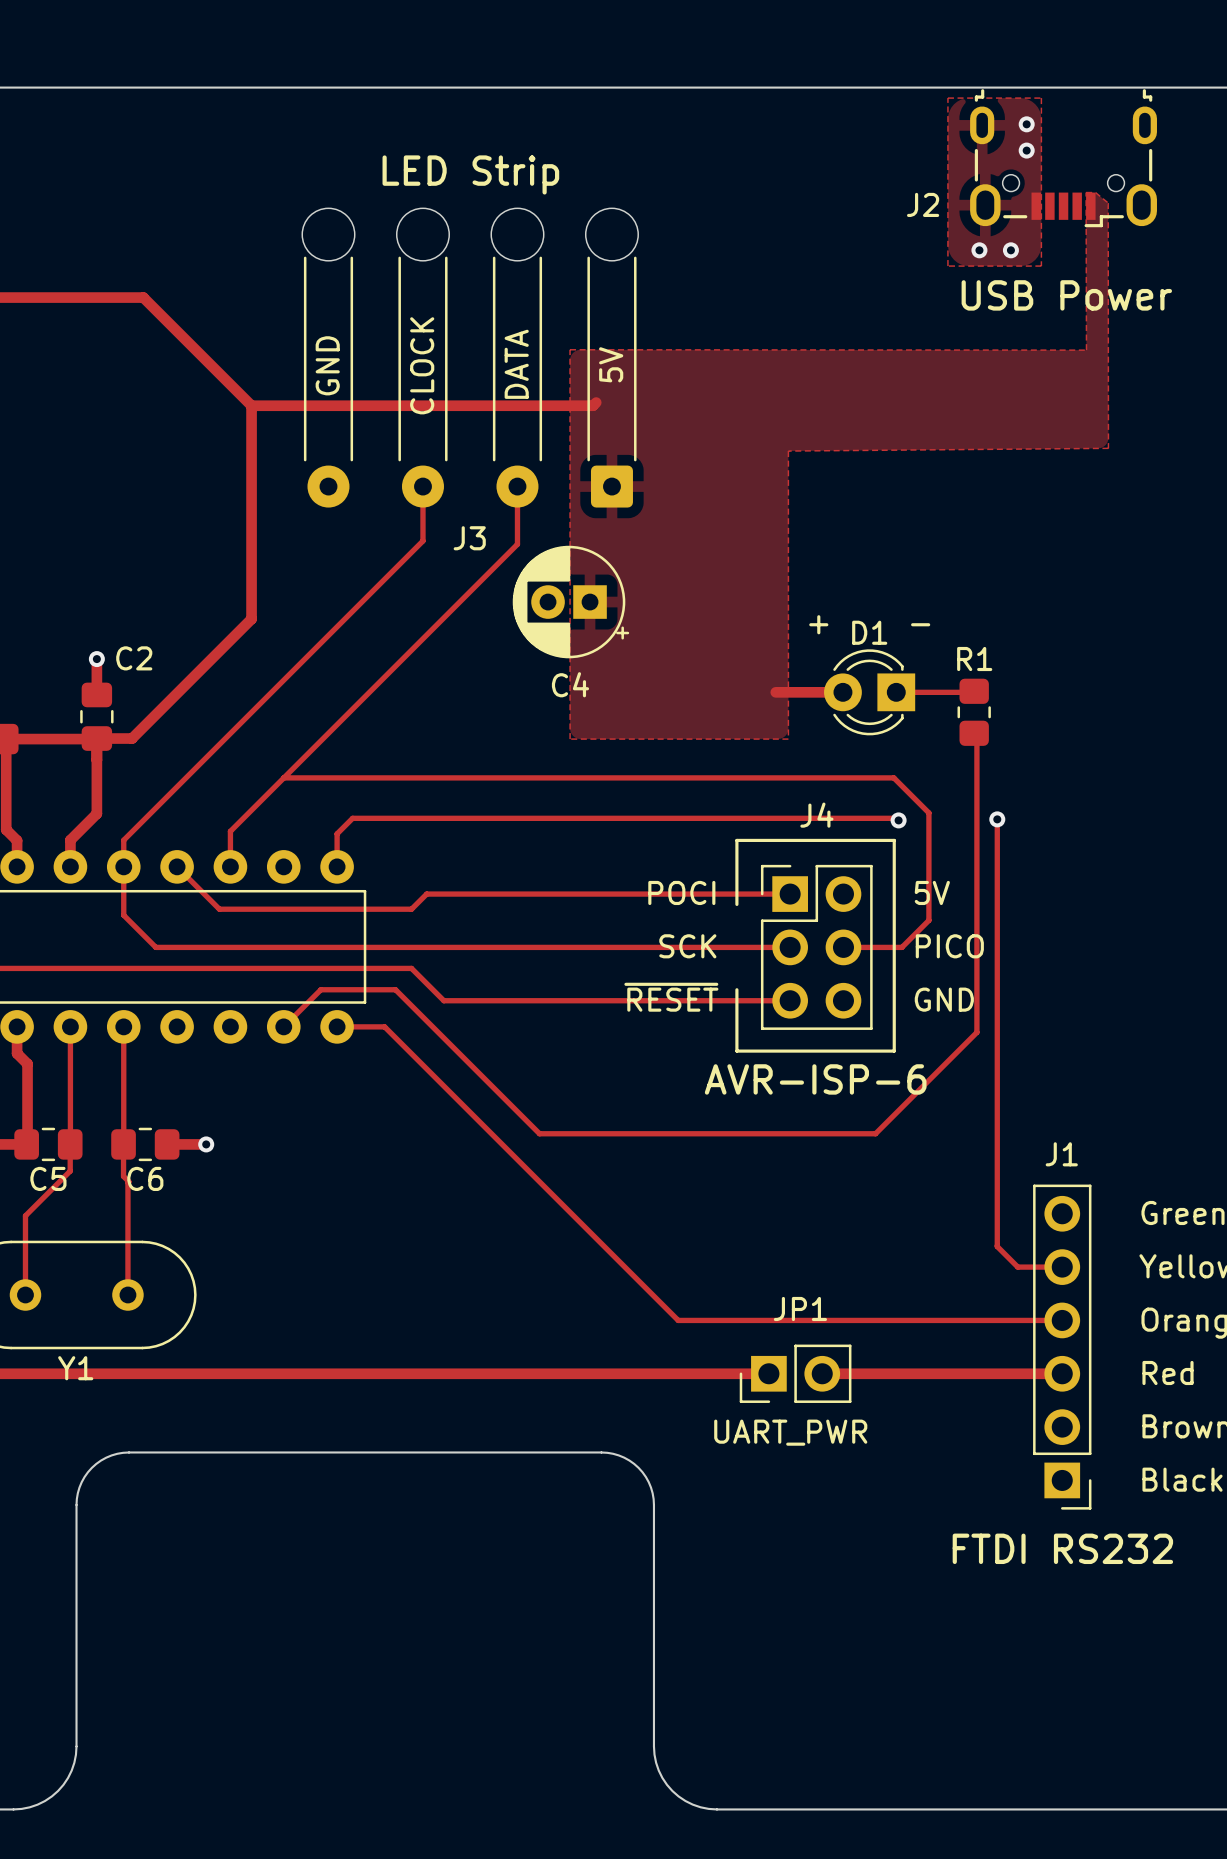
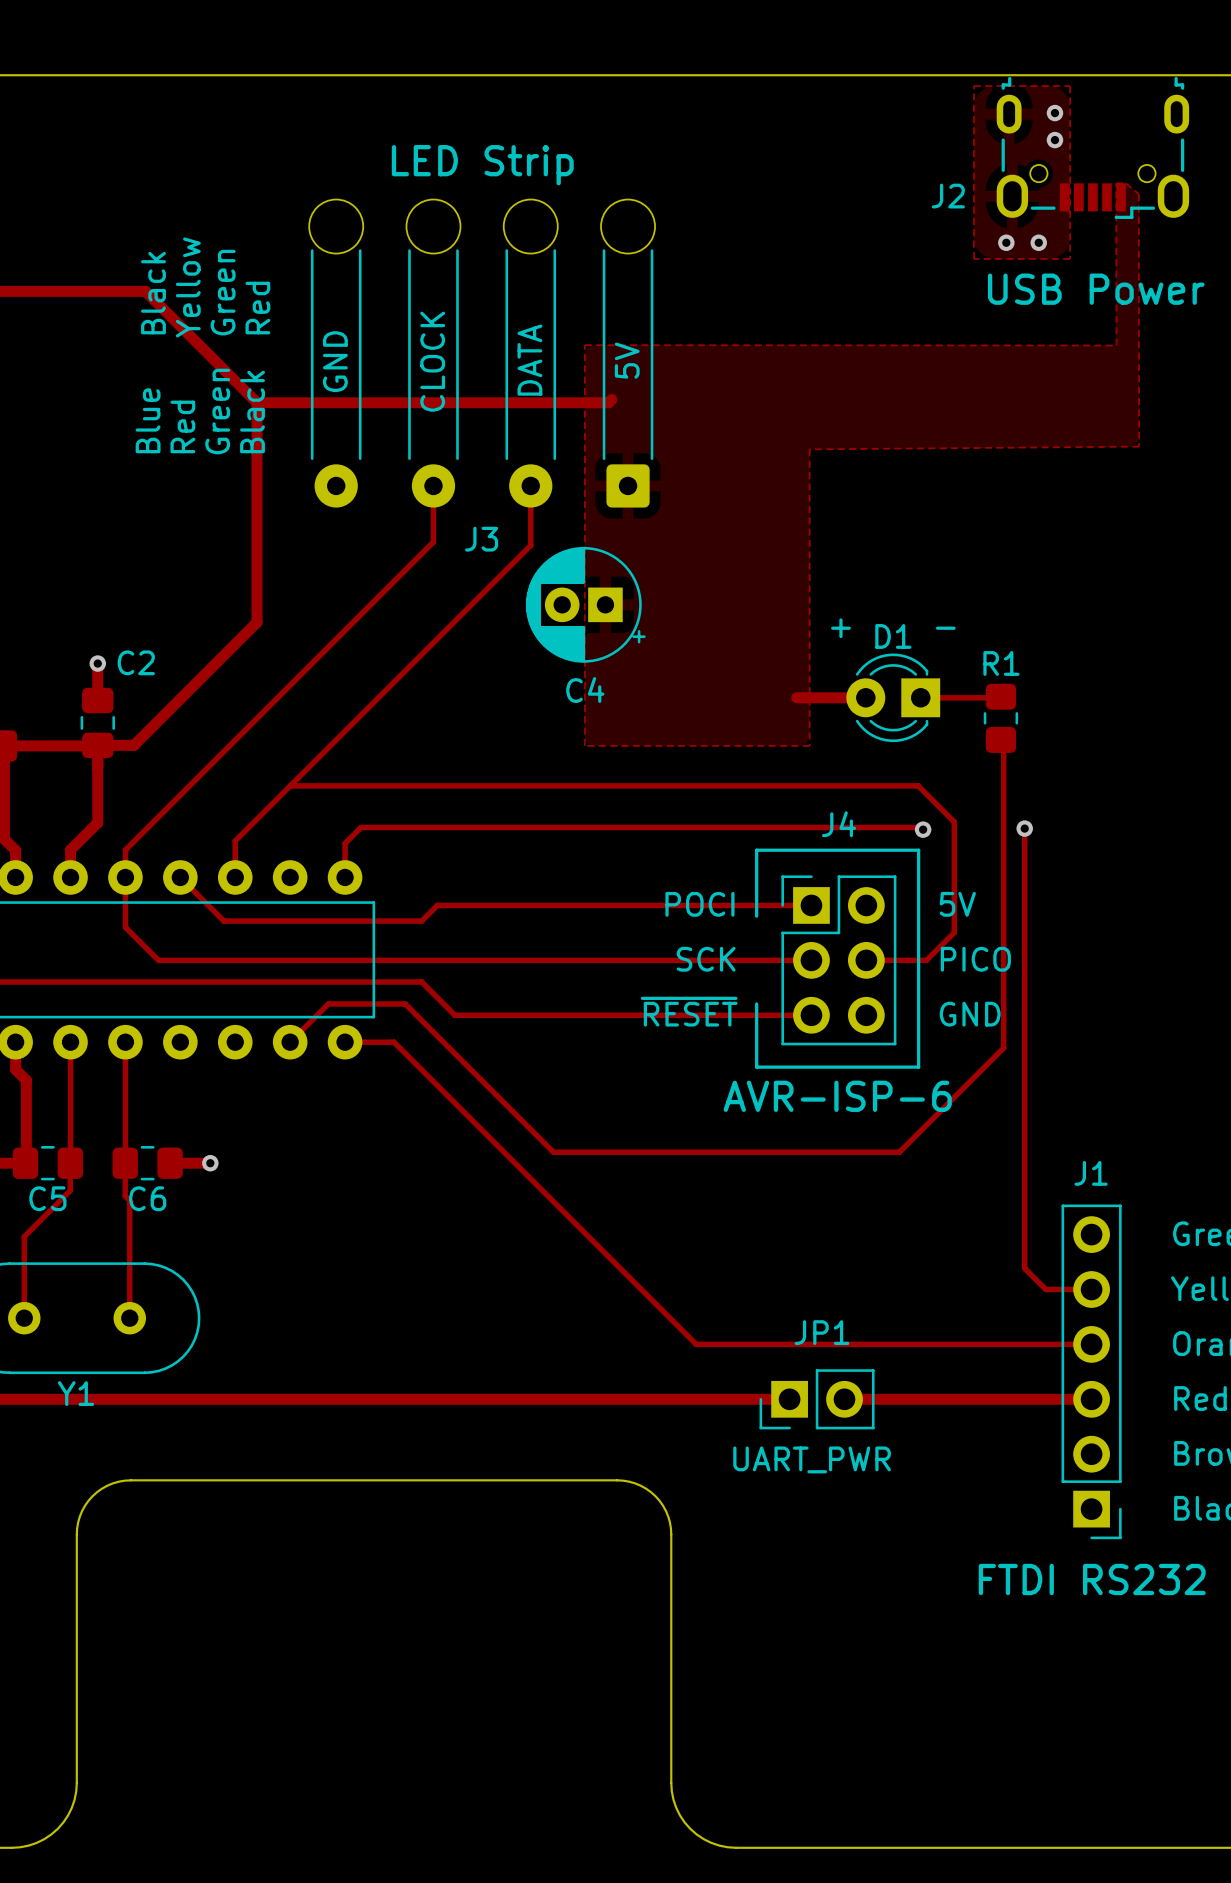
text: none -> Yellow (188, 287)
text: none -> Green (223, 292)
text: none -> Black (153, 293)
text: none -> Red (257, 308)
text: none -> Green (217, 411)
text: none -> Black (252, 412)
text: none -> Blue (148, 420)
text: none -> Red (182, 426)

